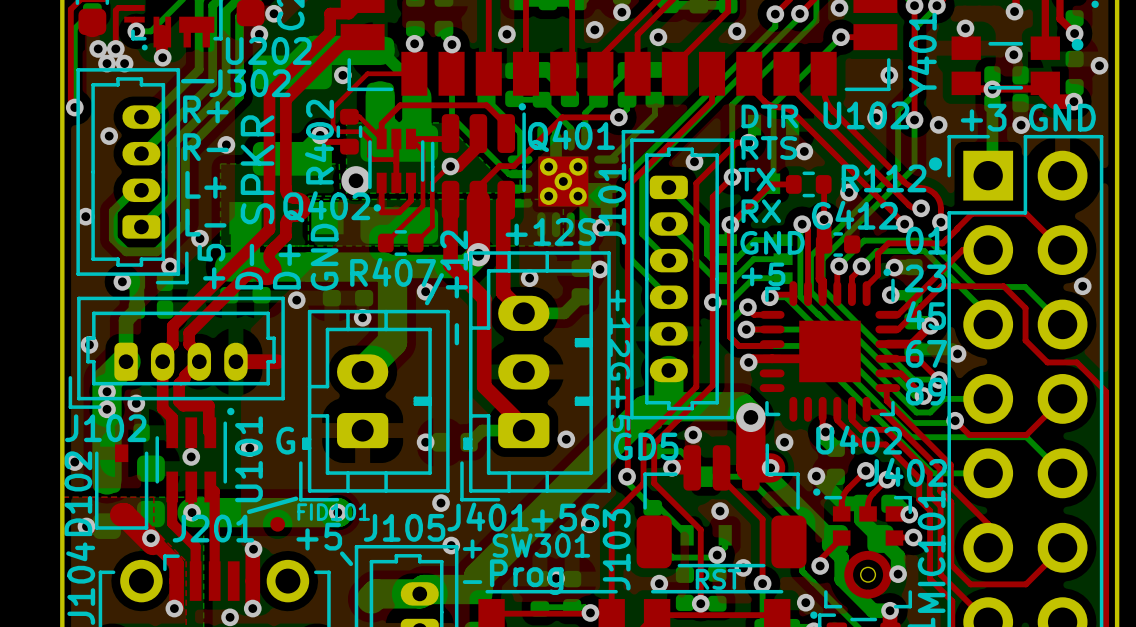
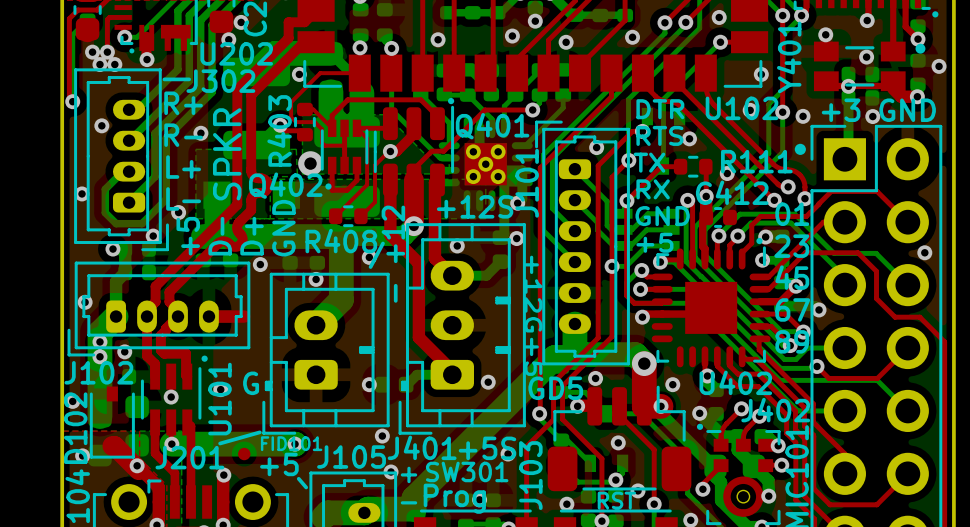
R402 name: R402 (319, 142) -> R403 (279, 130)
R112 name: R112 (884, 178) -> R111 (756, 161)
R407 name: R407 (393, 272) -> R408 (341, 241)

